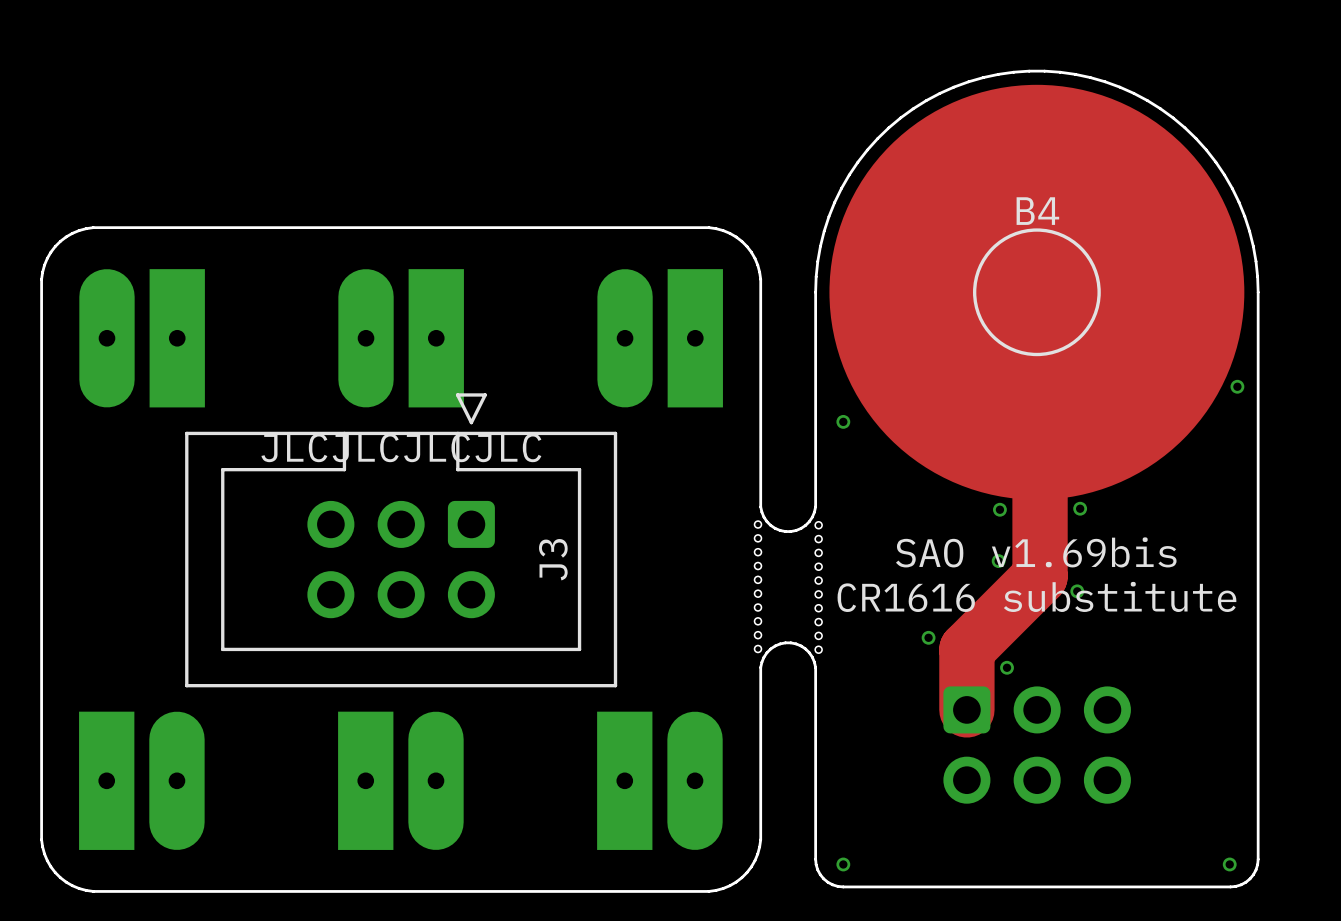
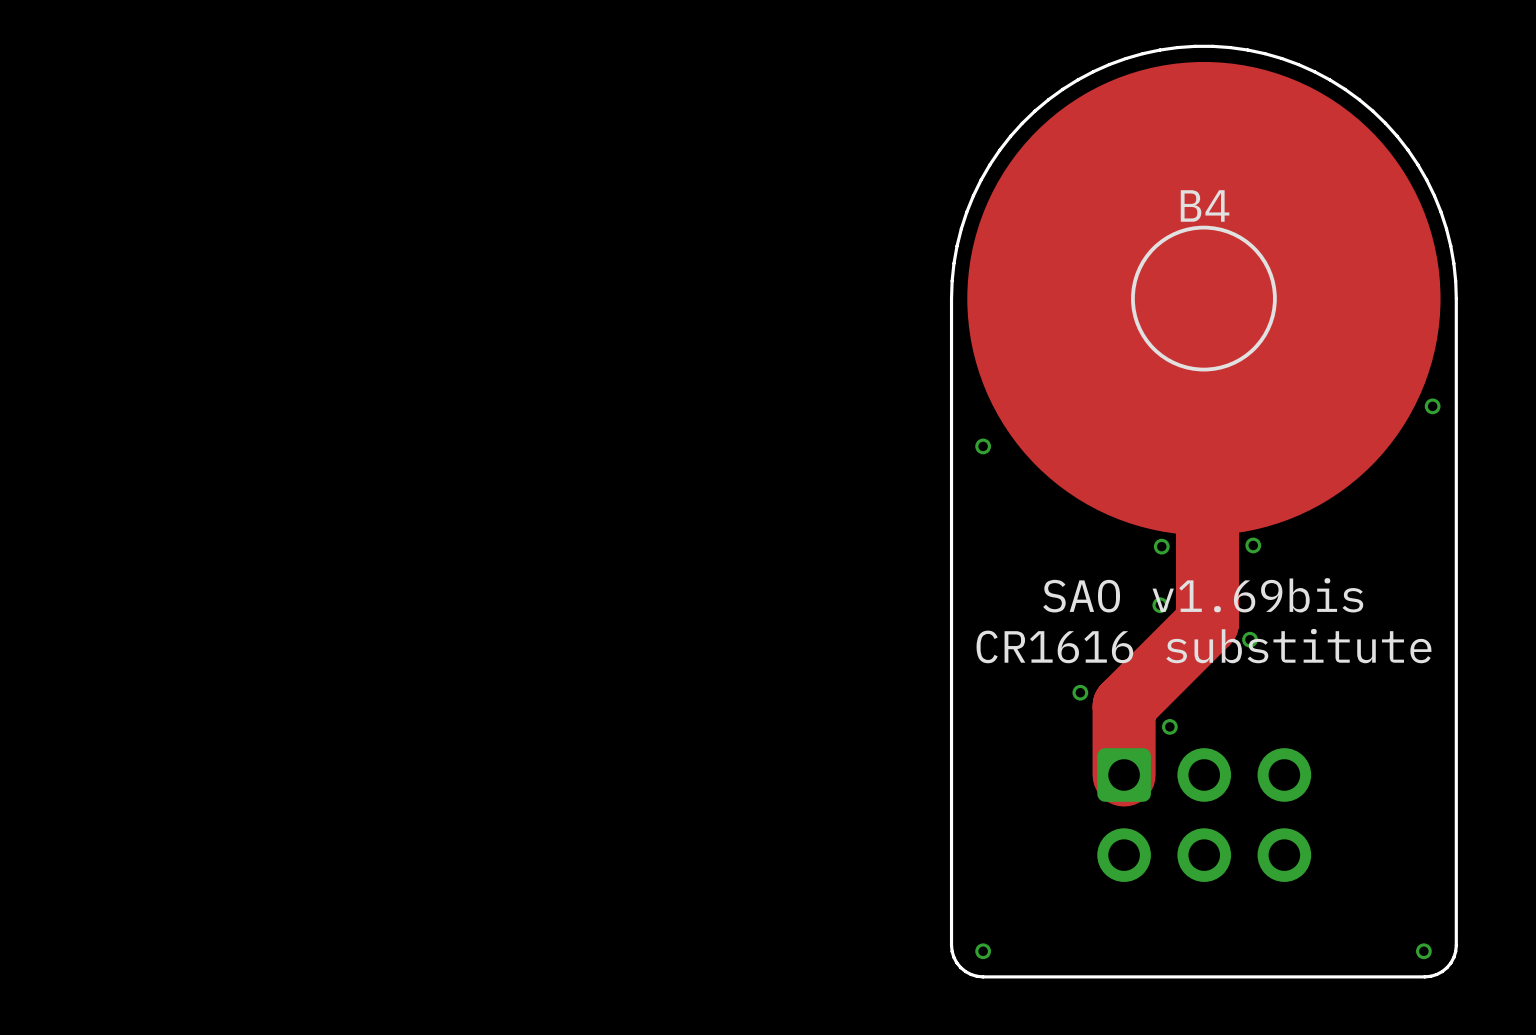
part: (142, 338) -> none
part: (401, 338) -> none
part: (660, 338) -> none
text: JLCJLCJLCJLC (401, 447) -> none
board edge: (815, 506) (812, 517) (805, 525) (790, 531) (780, 530) (770, 525) (761, 512) (760, 279) (755, 258) (746, 246) (736, 236) (723, 230) (709, 227) (93, 227) (72, 233) (60, 241) (50, 252) (44, 265) (41, 279) (41, 839) (44, 853) (50, 866) (60, 877) (72, 885) (93, 891) (709, 891) (723, 888) (736, 882) (746, 872) (755, 860) (759, 846) (760, 667) (763, 657) (775, 645) (790, 642) (805, 648) (812, 657) (815, 667) -> (951, 543) (951, 726)
part: (758, 524) -> none
part: (818, 525) -> none
part: (758, 538) -> none
part: (818, 539) -> none
J3: (401, 540) -> none
part: (758, 552) -> none
part: (818, 552) -> none
part: (758, 566) -> none
part: (818, 566) -> none
part: (758, 579) -> none
part: (818, 580) -> none
part: (758, 593) -> none
part: (818, 594) -> none
part: (758, 607) -> none
part: (818, 608) -> none
part: (758, 621) -> none
part: (818, 622) -> none
part: (758, 635) -> none
part: (818, 635) -> none
part: (758, 648) -> none
part: (818, 649) -> none
part: (141, 780) -> none
part: (400, 780) -> none
part: (659, 780) -> none

